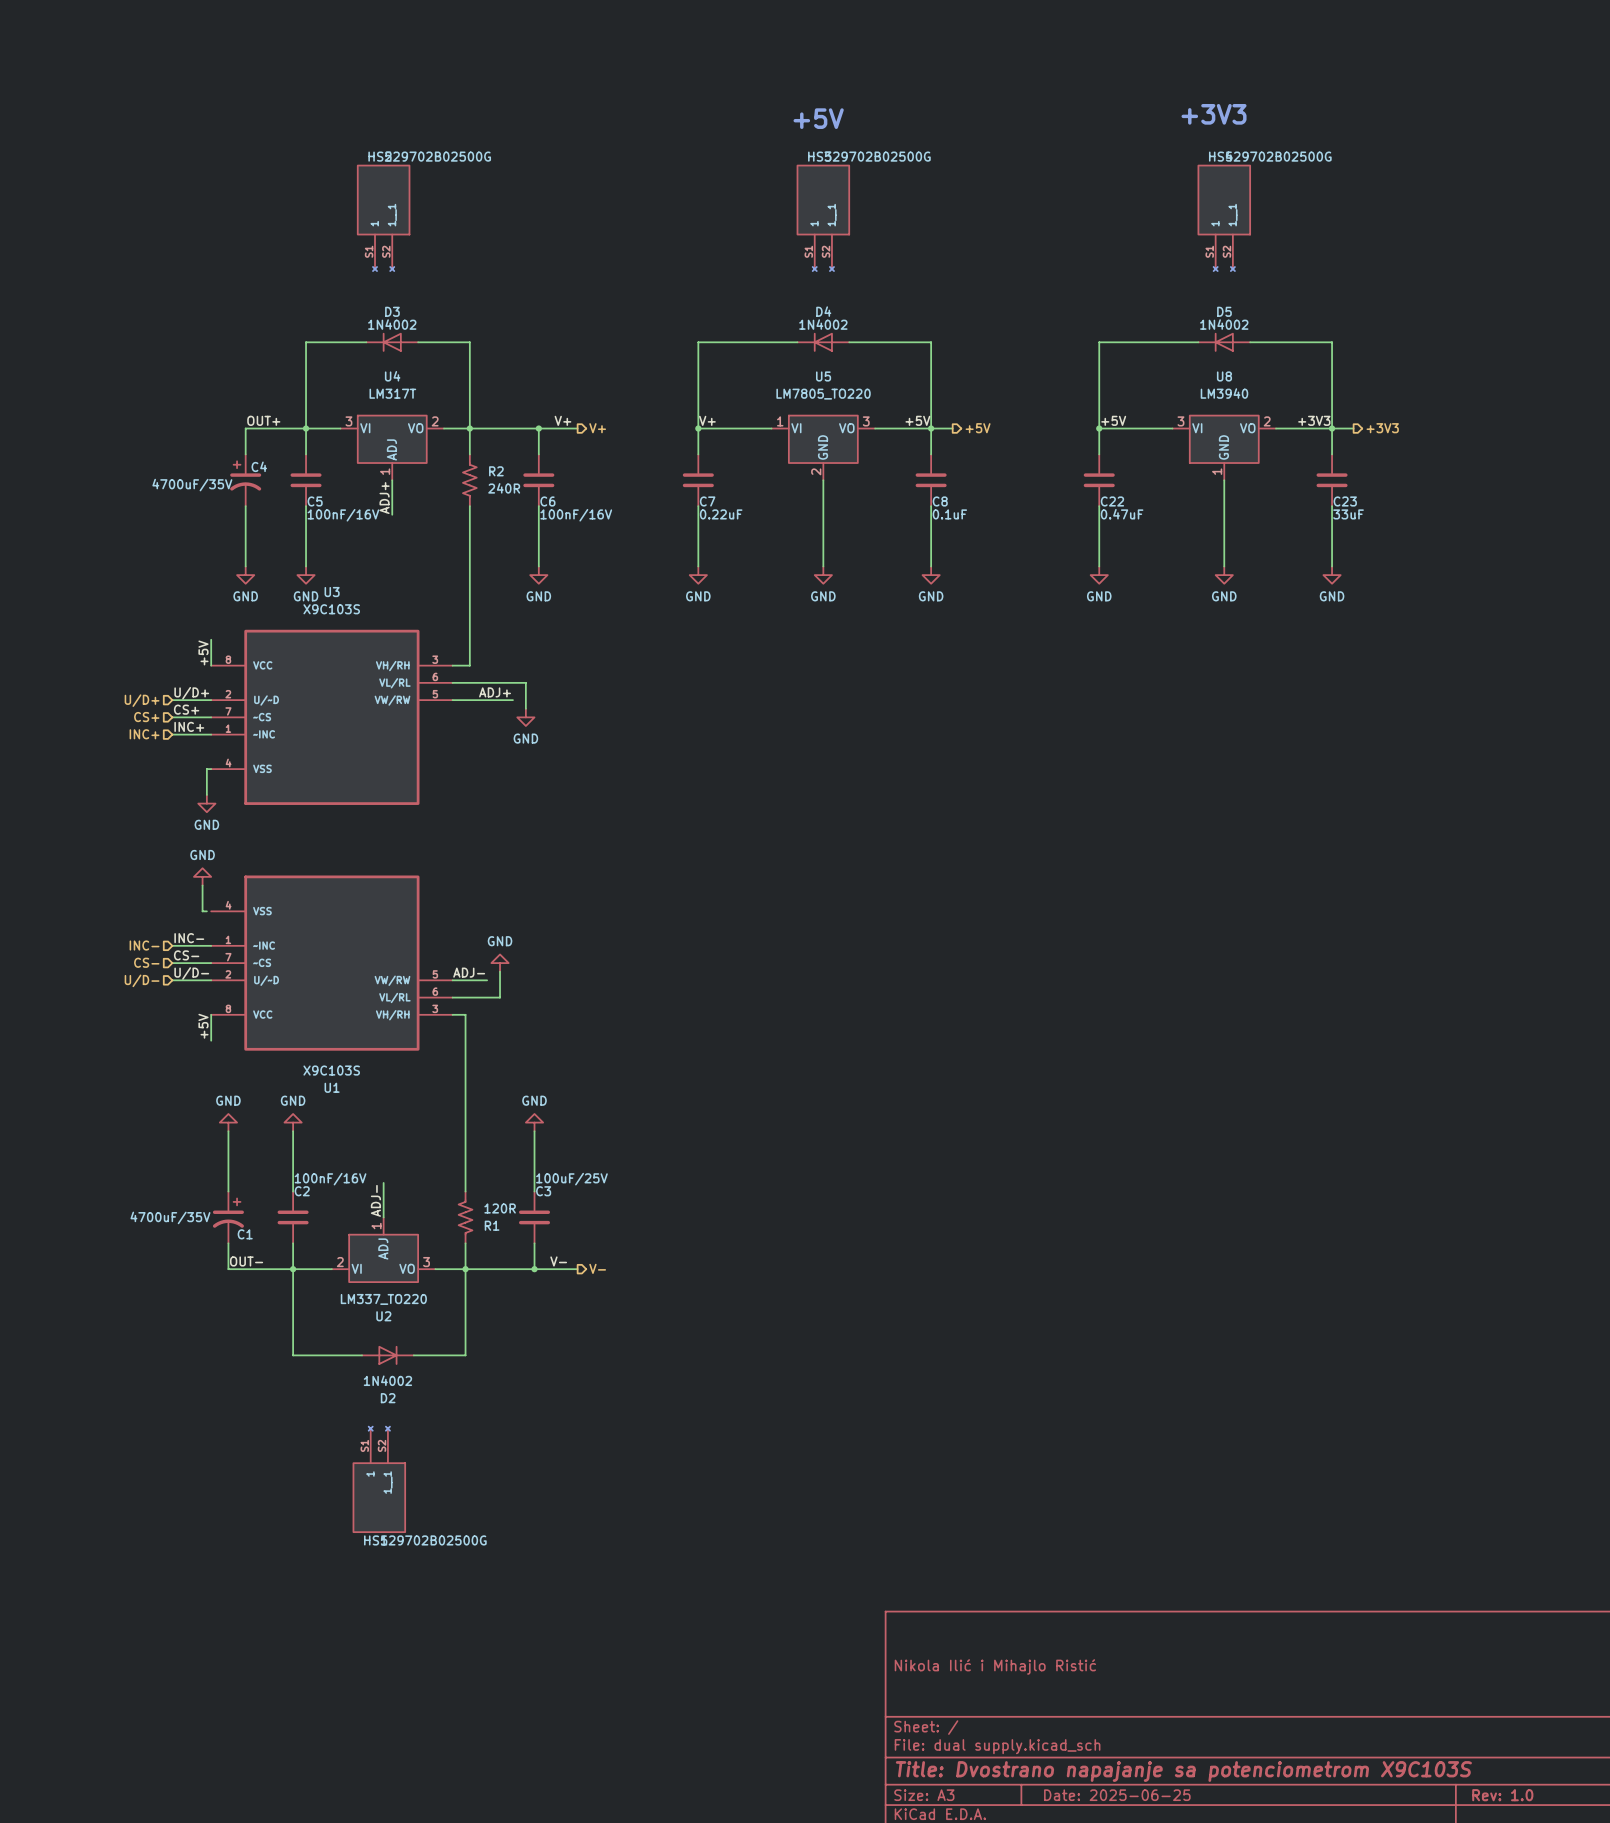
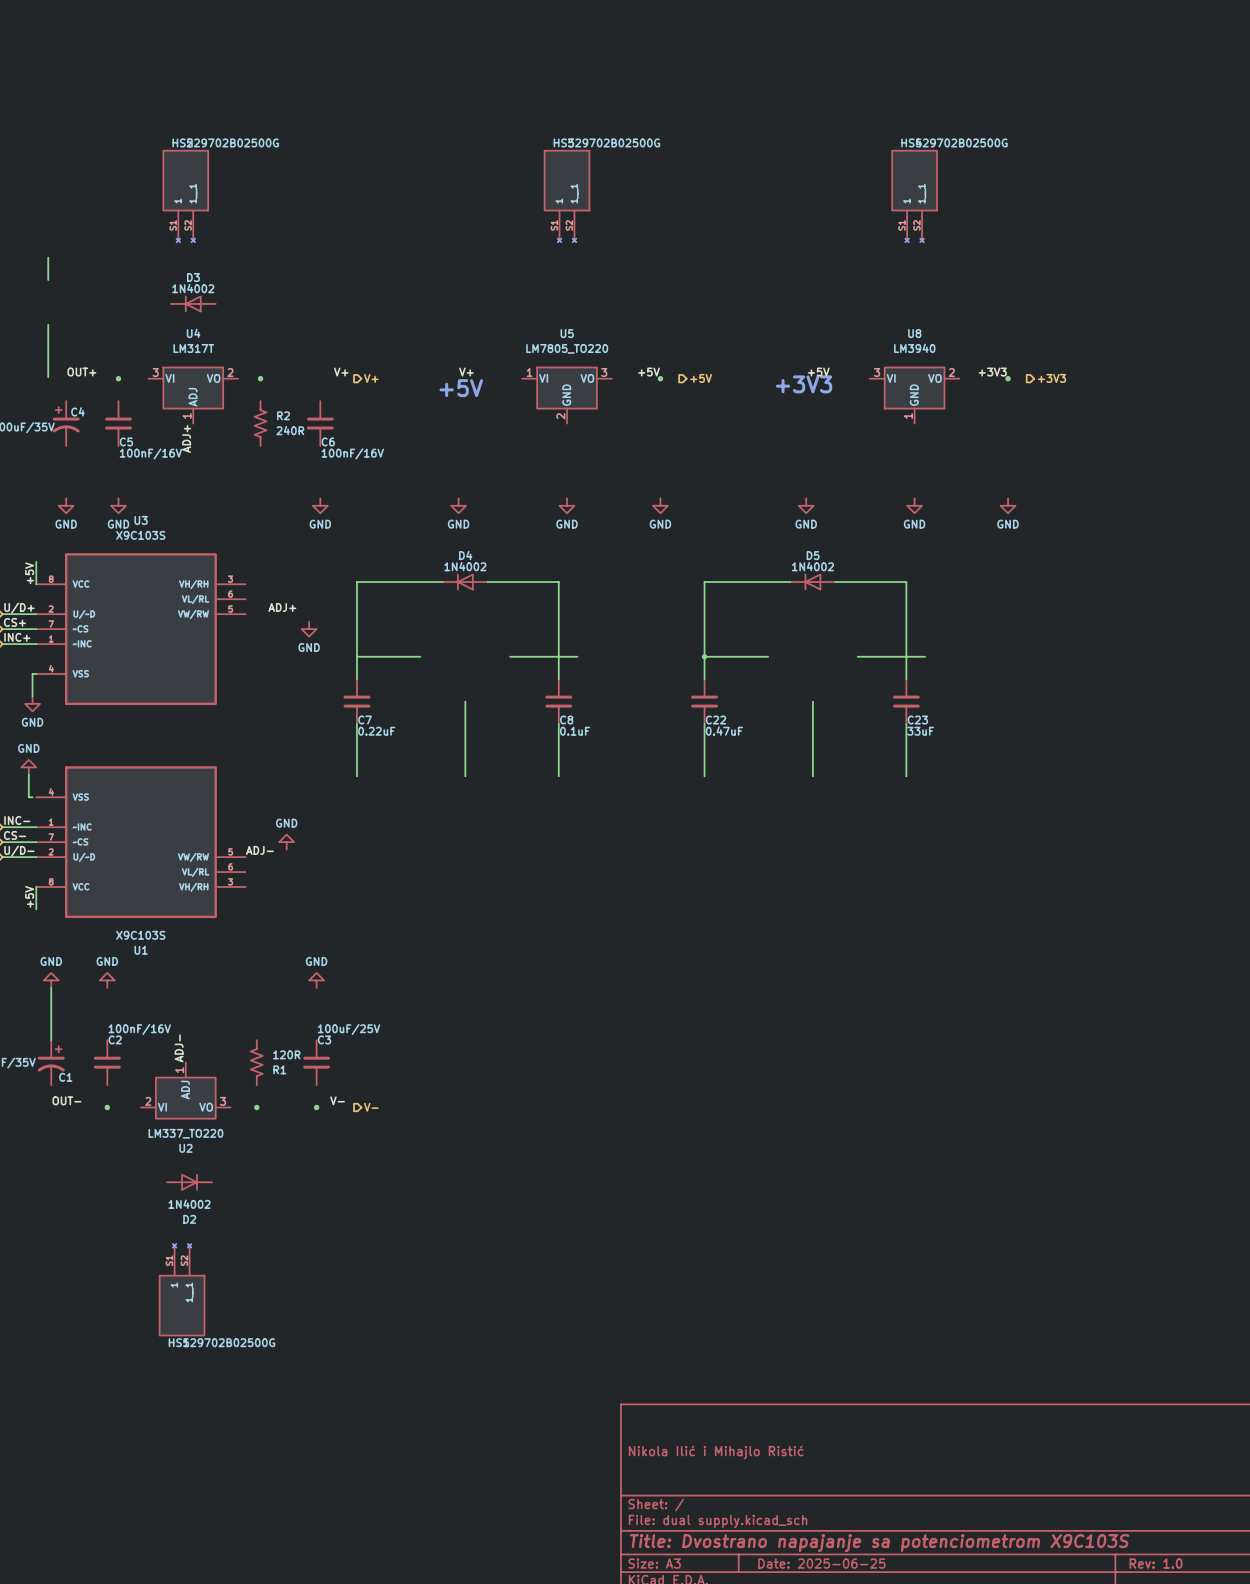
text: +3V3 (1214, 114) -> none
text: +5V (818, 118) -> none
wire: none -> (48, 257) (48, 280)
wire: (366, 342) (306, 342) (306, 454) -> none
wire: (418, 342) (469, 342) (469, 454) -> none
wire: (797, 342) (698, 342) (698, 454) -> none
D4 position: (823, 342) -> (465, 582)
wire: (849, 342) (931, 342) (931, 454) -> none
wire: (1198, 342) (1099, 342) (1099, 454) -> none
D5 position: (1224, 342) -> (812, 582)
wire: (1250, 342) (1332, 342) (1332, 454) -> none
wire: (340, 428) (245, 428) (245, 454) -> none
wire: (443, 428) (577, 428) -> none
wire: (538, 428) (538, 454) -> none
junction: (538, 428) -> none
wire: (698, 428) (771, 428) -> none
junction: (698, 428) -> none
wire: (875, 428) (952, 428) -> none
wire: (1099, 428) (1172, 428) -> none
junction: (1099, 428) -> none
wire: (1276, 428) (1353, 428) -> none
text: none -> +3V3 (804, 384)
text: none -> +5V (461, 388)
wire: (392, 480) (392, 514) -> none
C7 position: (698, 480) -> (356, 701)
wire: (823, 480) (823, 566) -> none
C8 position: (931, 480) -> (558, 701)
C22 position: (1099, 480) -> (704, 701)
wire: (1224, 480) (1224, 566) -> none
C23 position: (1332, 480) -> (906, 701)
wire: (245, 506) (245, 566) -> (48, 324) (48, 377)
wire: (306, 506) (306, 566) -> none
wire: (469, 506) (469, 665) (452, 665) -> none
wire: (538, 506) (538, 566) -> none
wire: (698, 506) (698, 566) -> none
wire: (931, 506) (931, 566) -> none
wire: (1099, 506) (1099, 566) -> none
wire: (1332, 506) (1332, 566) -> none
wire: none -> (442, 582) (356, 582) (356, 679)
wire: none -> (487, 582) (558, 582) (558, 679)
wire: none -> (790, 582) (704, 582) (704, 679)
wire: none -> (835, 582) (906, 582) (906, 679)
wire: (452, 682) (525, 682) (525, 708) -> none
wire: (452, 700) (512, 700) -> none
wire: none -> (356, 656) (420, 656)
wire: none -> (510, 656) (577, 656)
wire: none -> (704, 656) (768, 656)
junction: none -> (704, 656)
wire: none -> (857, 656) (925, 656)
wire: none -> (465, 701) (465, 776)
wire: none -> (812, 701) (812, 776)
wire: none -> (356, 724) (356, 776)
wire: none -> (558, 724) (558, 776)
wire: none -> (704, 724) (704, 776)
wire: none -> (906, 724) (906, 776)
wire: (500, 971) (500, 997) (452, 997) -> none
wire: (452, 980) (487, 980) -> none
wire: (452, 1014) (465, 1014) (465, 1191) -> none
wire: (293, 1131) (293, 1191) -> none
wire: (534, 1131) (534, 1191) -> none
wire: (383, 1182) (383, 1217) -> none
wire: (228, 1243) (228, 1269) (331, 1269) -> none
wire: (293, 1243) (293, 1355) (362, 1355) -> none
wire: (465, 1243) (465, 1355) (413, 1355) -> none
wire: (534, 1243) (534, 1269) -> none
wire: (435, 1269) (577, 1269) -> none

